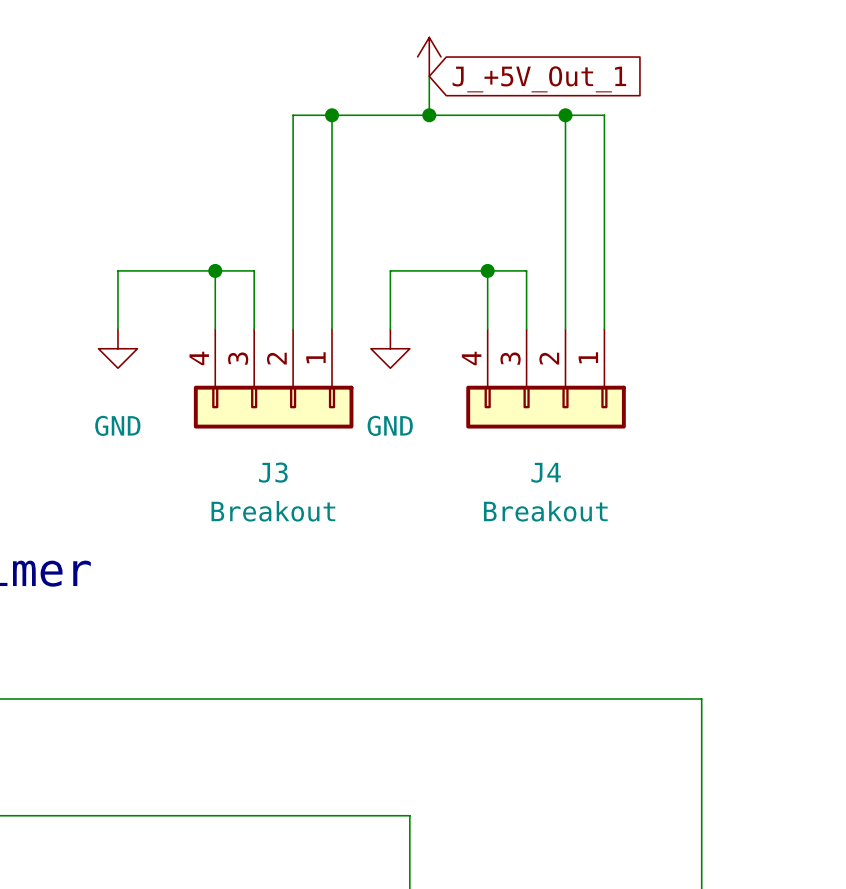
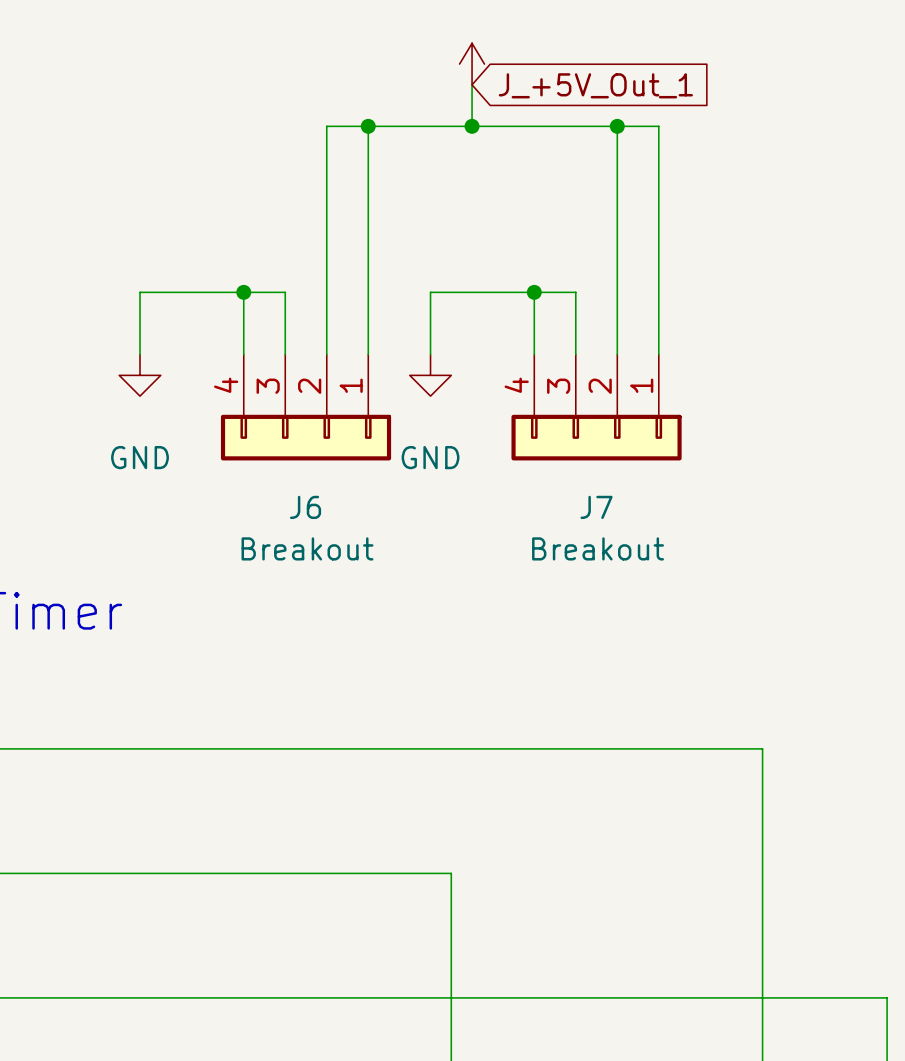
J3 name: J3 (273, 472) -> J6 (305, 507)
J4 name: J4 (546, 472) -> J7 (596, 507)

